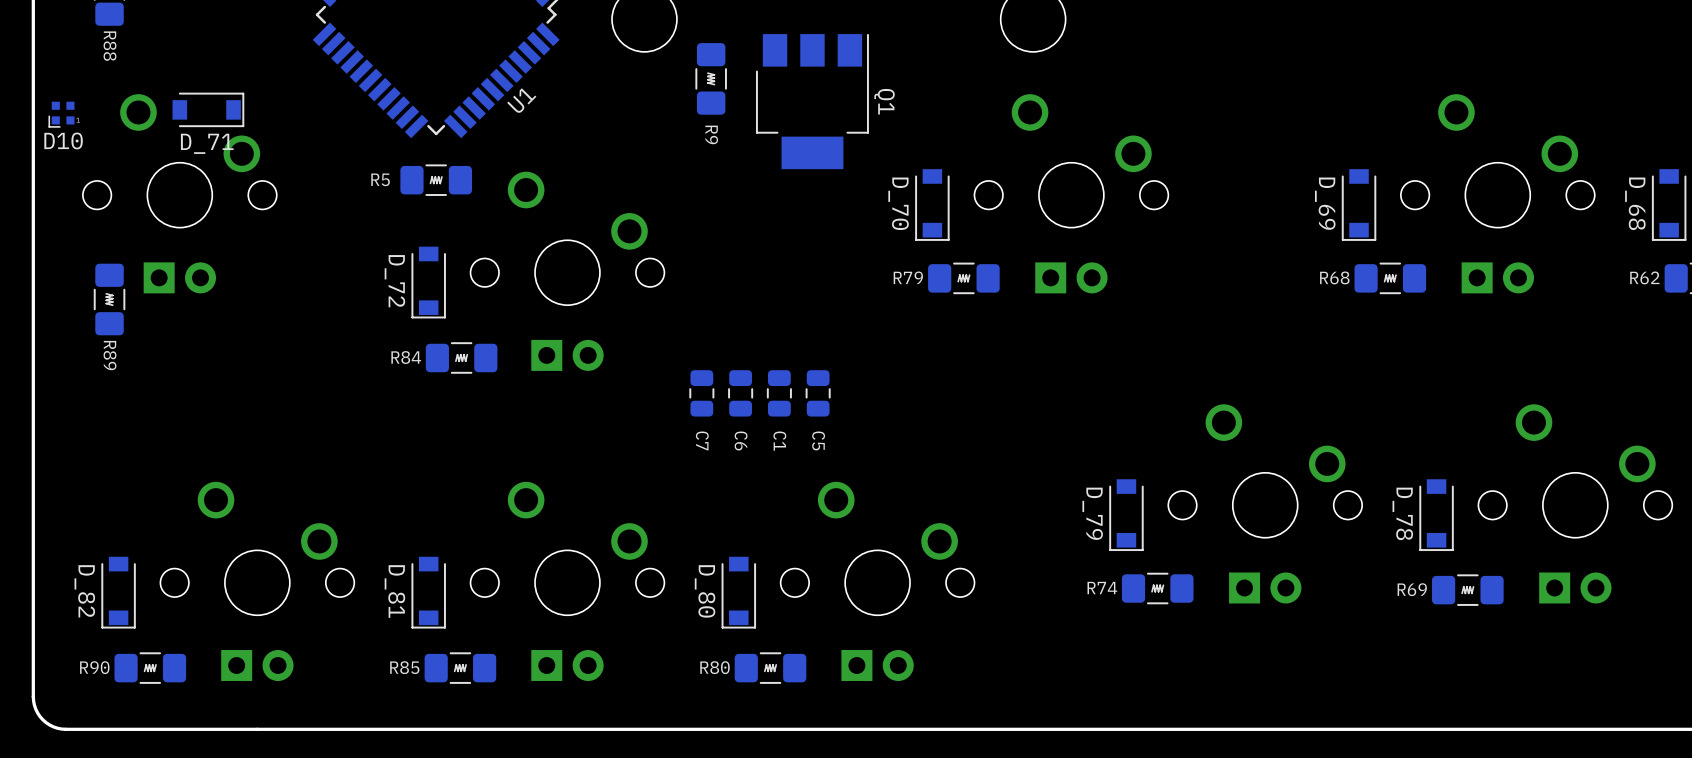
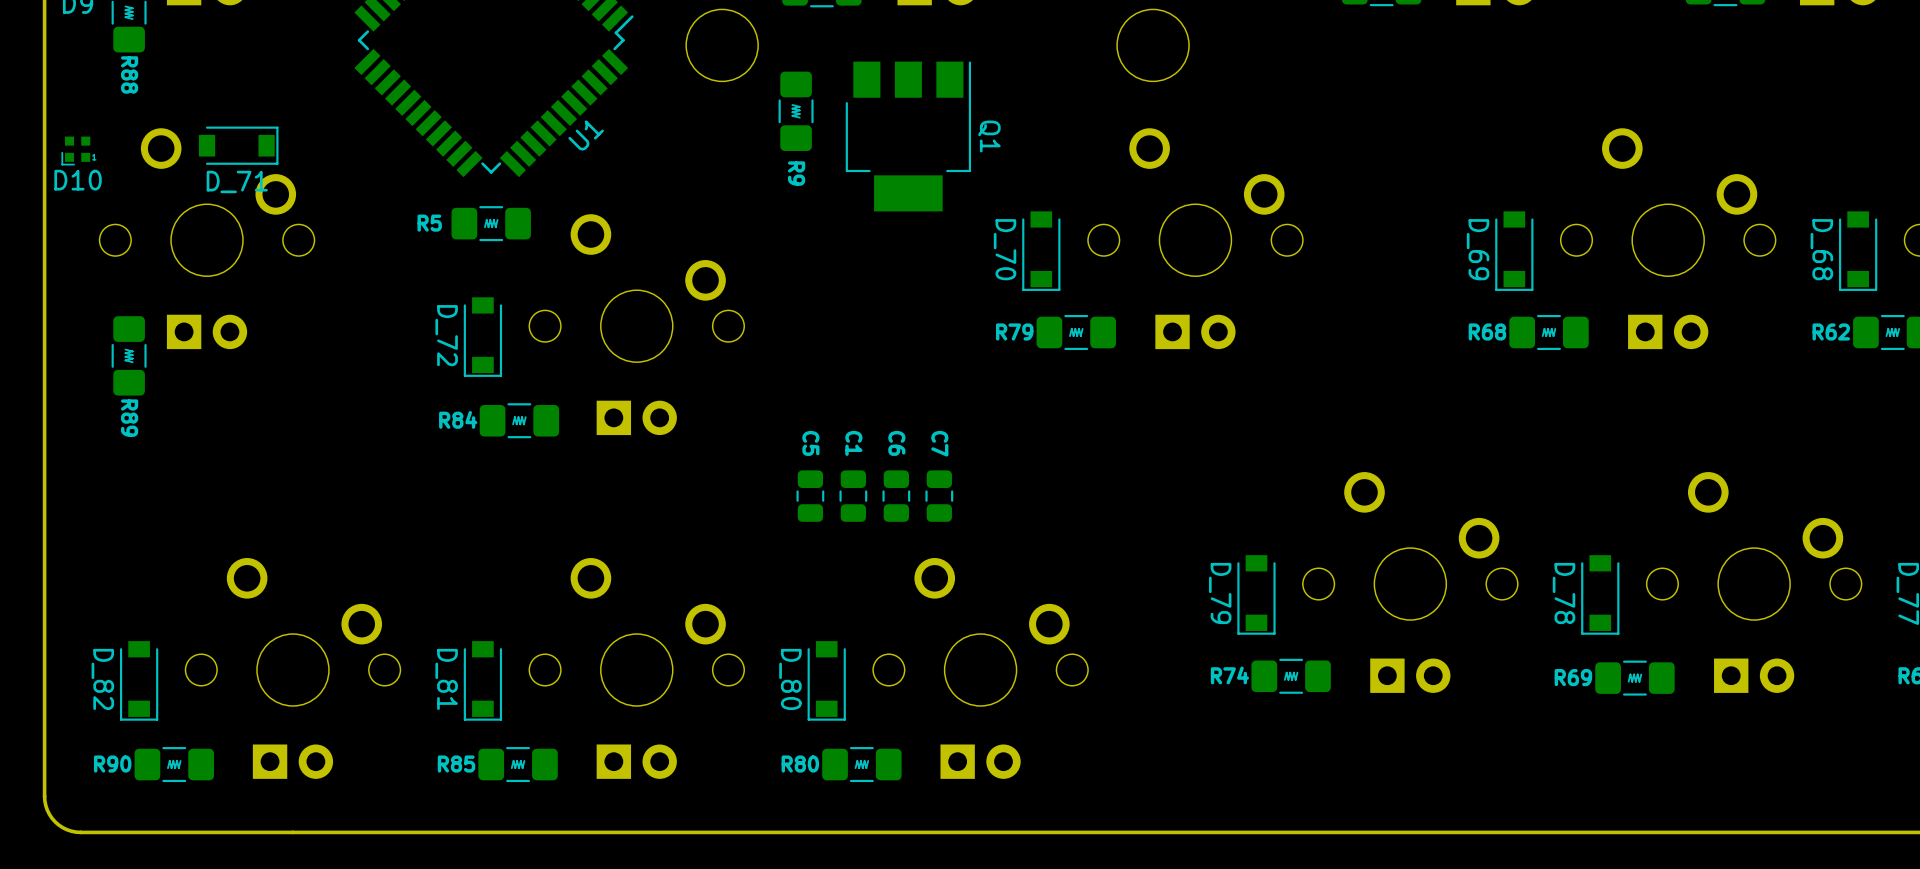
C7 position: (701, 393) -> (939, 496)
C6 position: (740, 393) -> (896, 496)
C1 position: (779, 393) -> (853, 496)
C5 position: (818, 393) -> (810, 496)
C7 name position: C7 (702, 440) -> C7 (939, 443)
C6 name position: C6 (741, 440) -> C6 (896, 443)
C5 name position: C5 (818, 440) -> C5 (810, 443)
C1 name position: C1 (779, 441) -> C1 (853, 443)

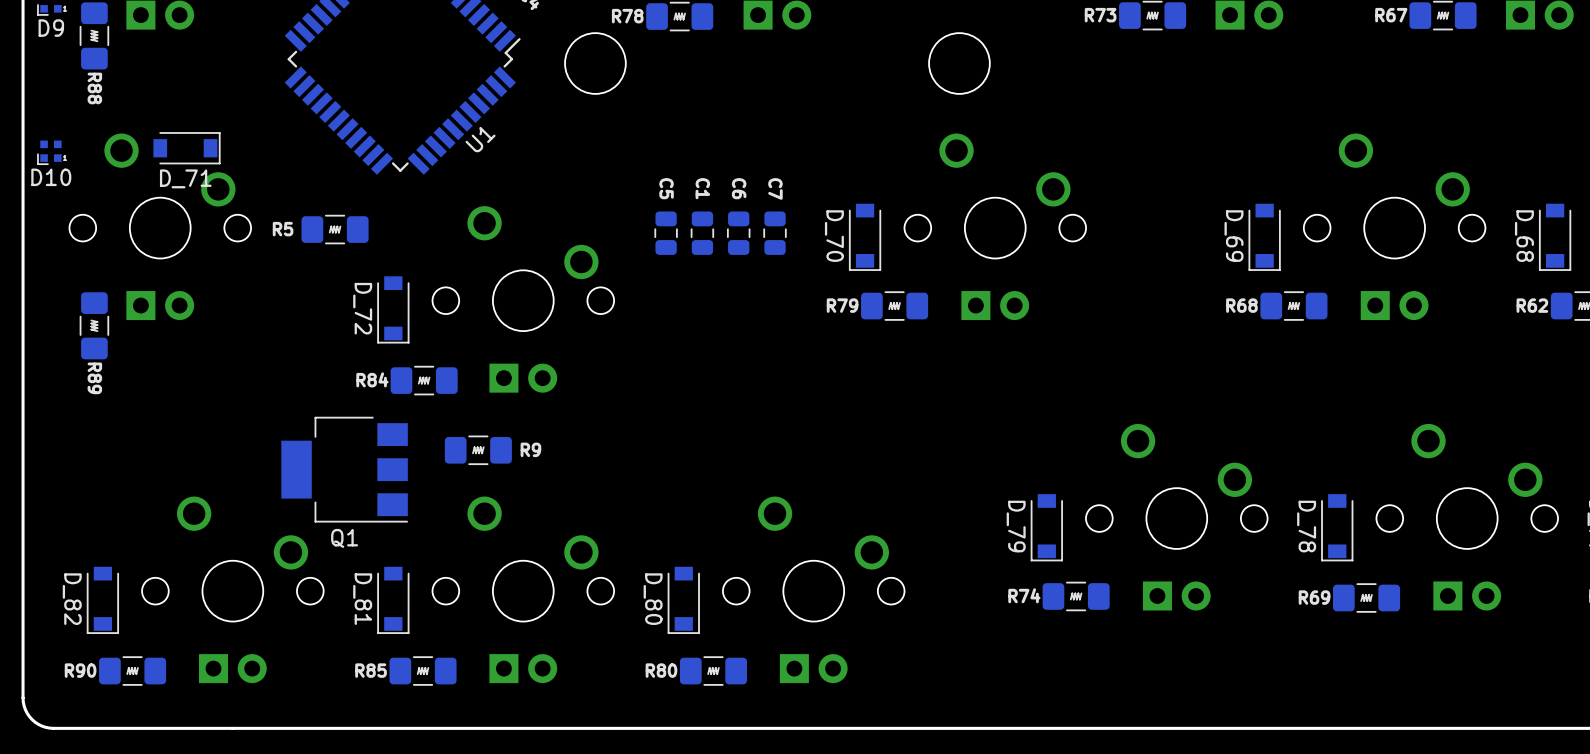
R9 rotation: 0° (796, 111) -> 90° clockwise (478, 450)
R9 position: (796, 111) -> (478, 450)
Q1 rotation: 0° (908, 136) -> 90° clockwise (344, 469)
Q1 position: (908, 136) -> (344, 469)
R9 name position: R9 (796, 173) -> R9 (530, 449)
R5 position: (491, 223) -> (335, 229)
C5 position: (810, 496) -> (666, 233)
C1 position: (853, 496) -> (702, 233)
C6 position: (896, 496) -> (738, 233)
C7 position: (939, 496) -> (775, 233)

